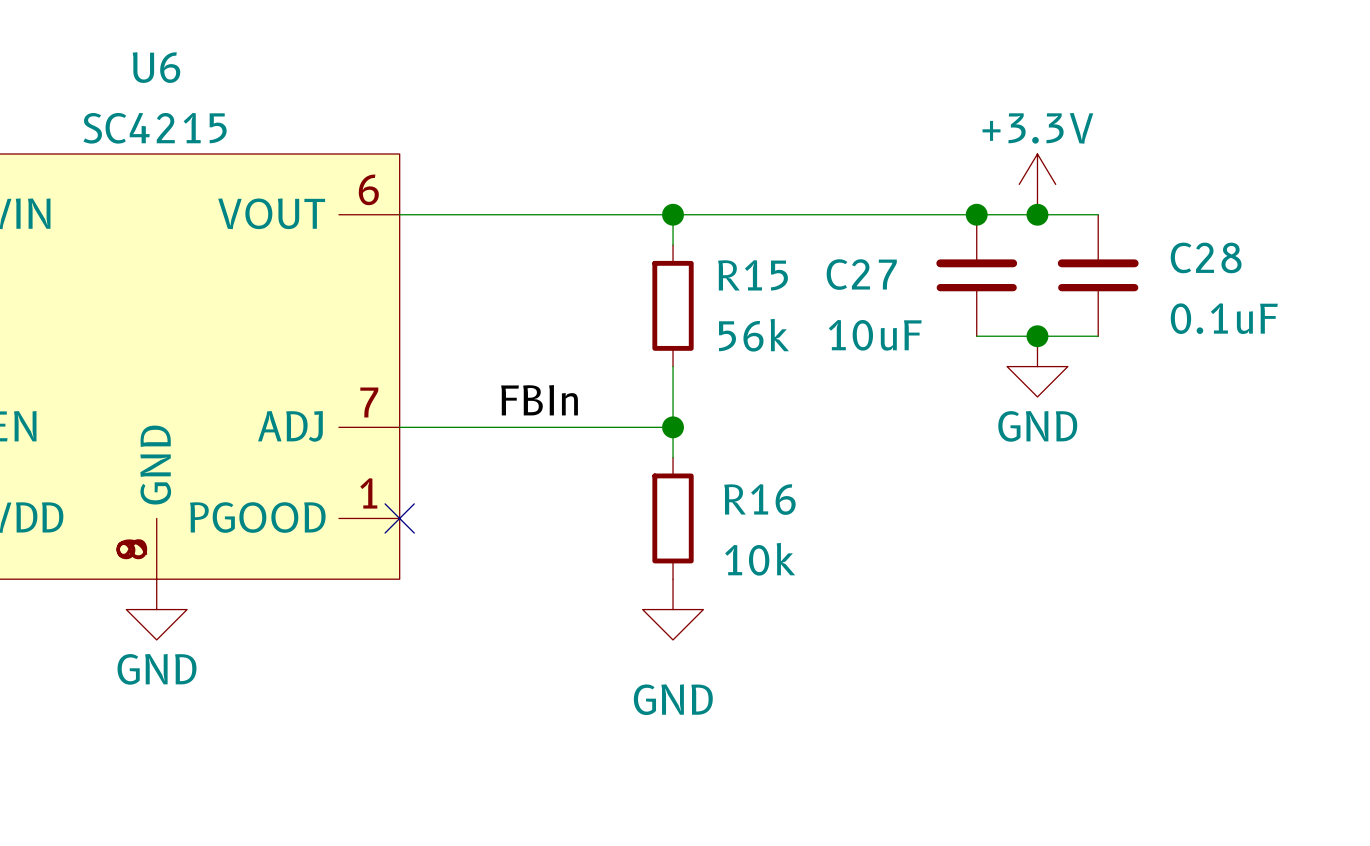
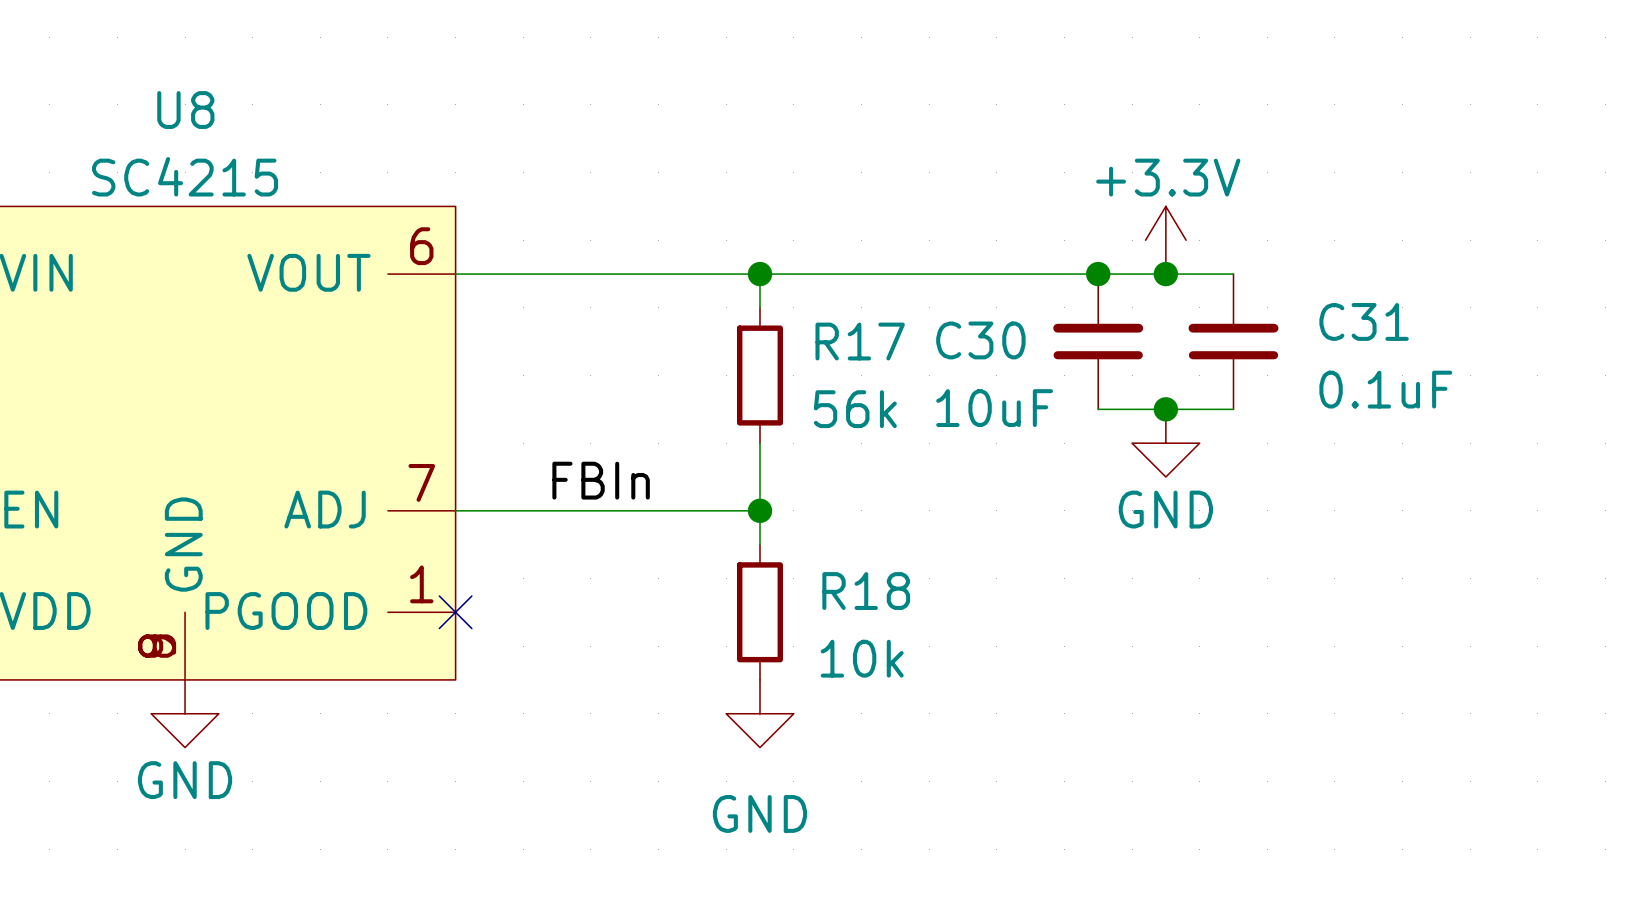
U6 name: U6 (156, 67) -> U8 (185, 110)
C28 name: C28 (1206, 257) -> C31 (1364, 321)
C27 name: C27 (861, 274) -> C30 (980, 340)
R15 name: R15 (753, 275) -> R17 (860, 341)
R16 name: R16 (759, 499) -> R18 (866, 591)

